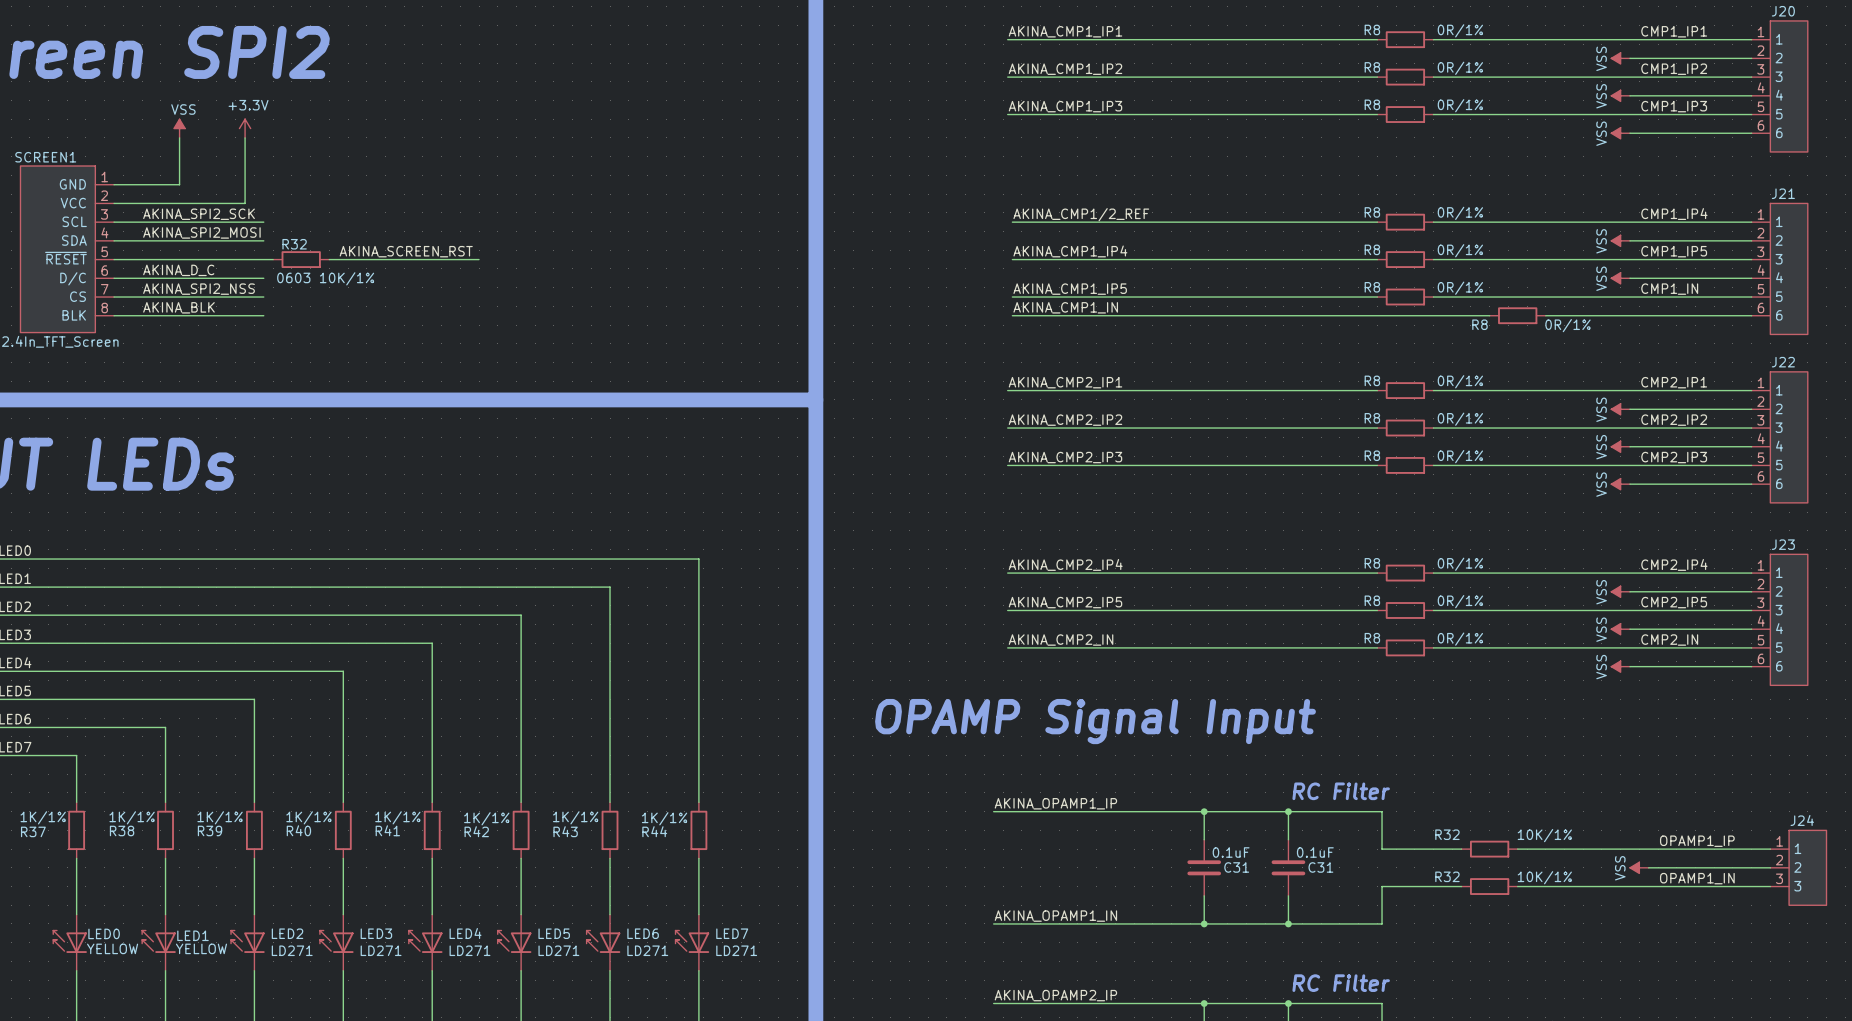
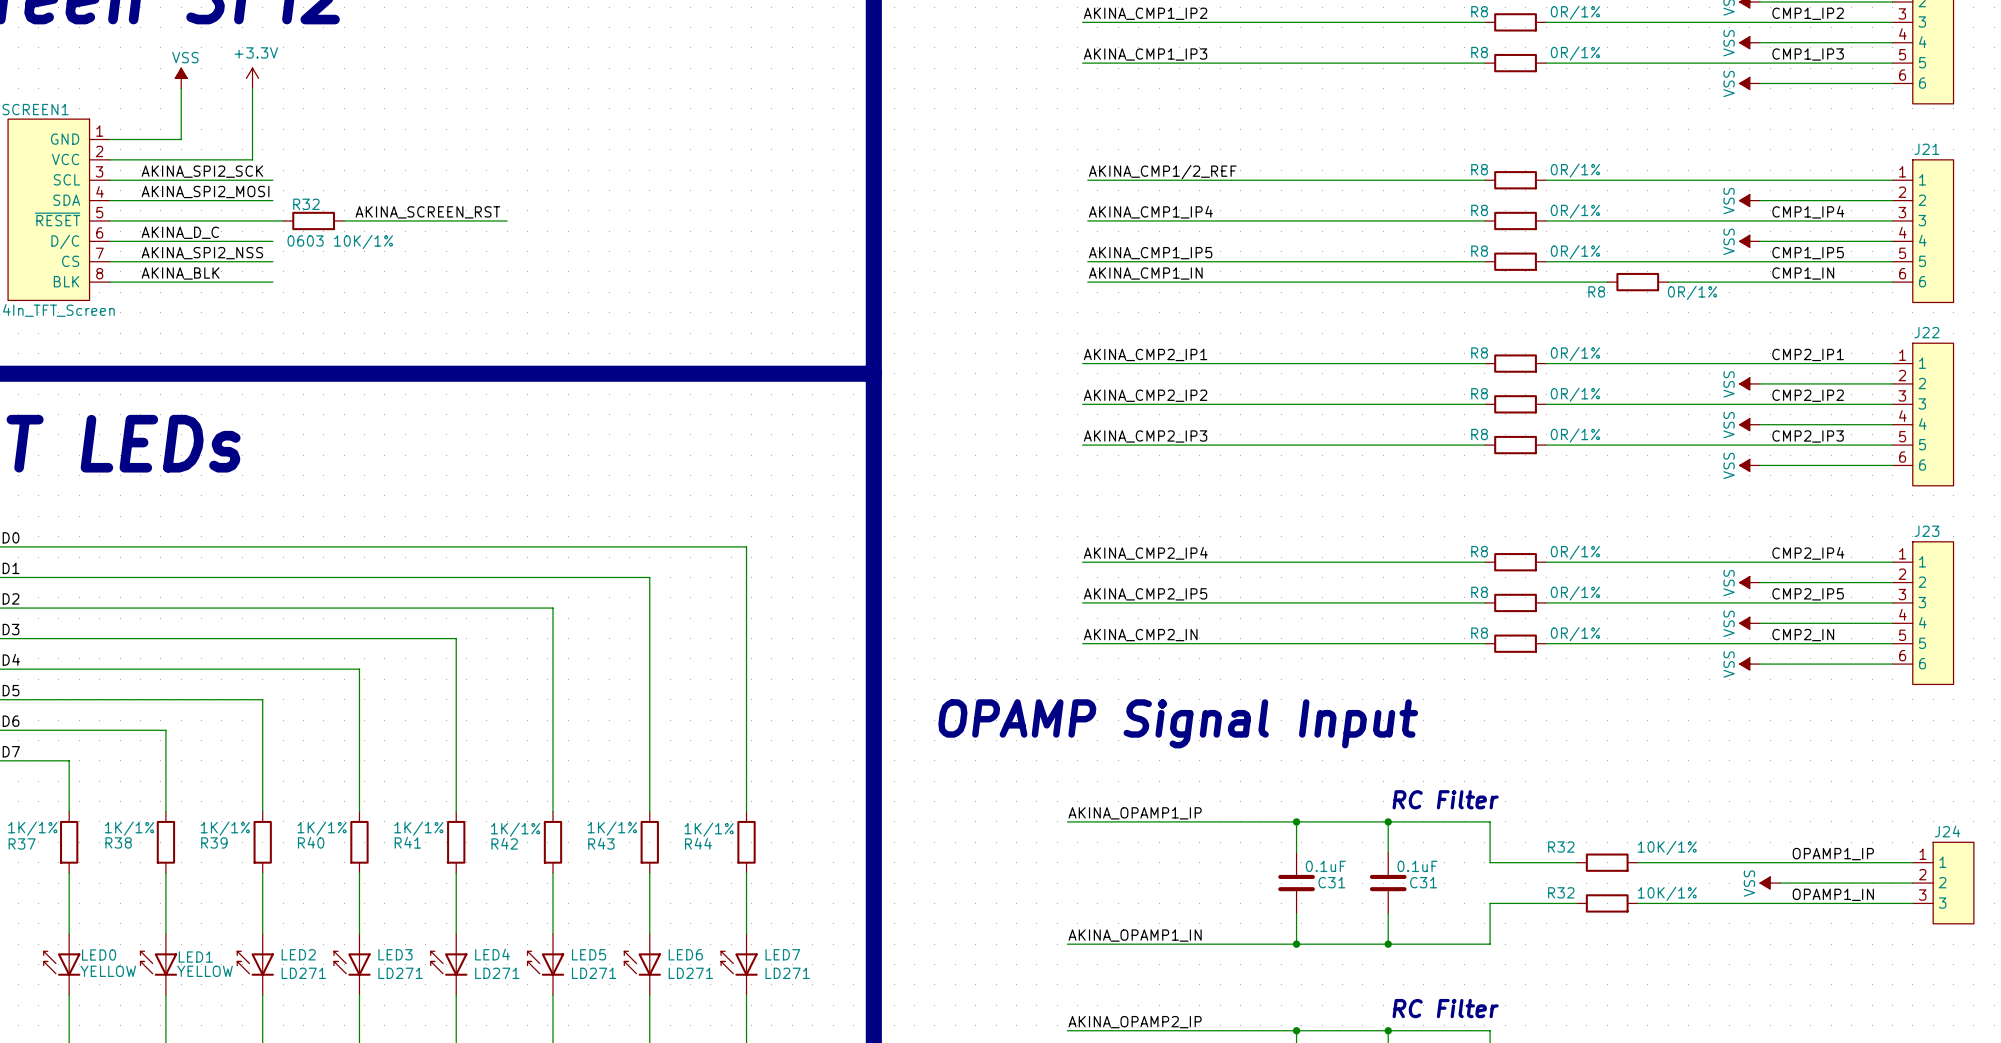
label: CMP1_IP4 (1674, 214) -> none
label: CMP1_IP5 (1674, 251) -> CMP1_IP4 (1808, 212)
label: CMP1_IN (1669, 289) -> CMP1_IP5 (1808, 253)
label: none -> CMP1_IN (1803, 273)

